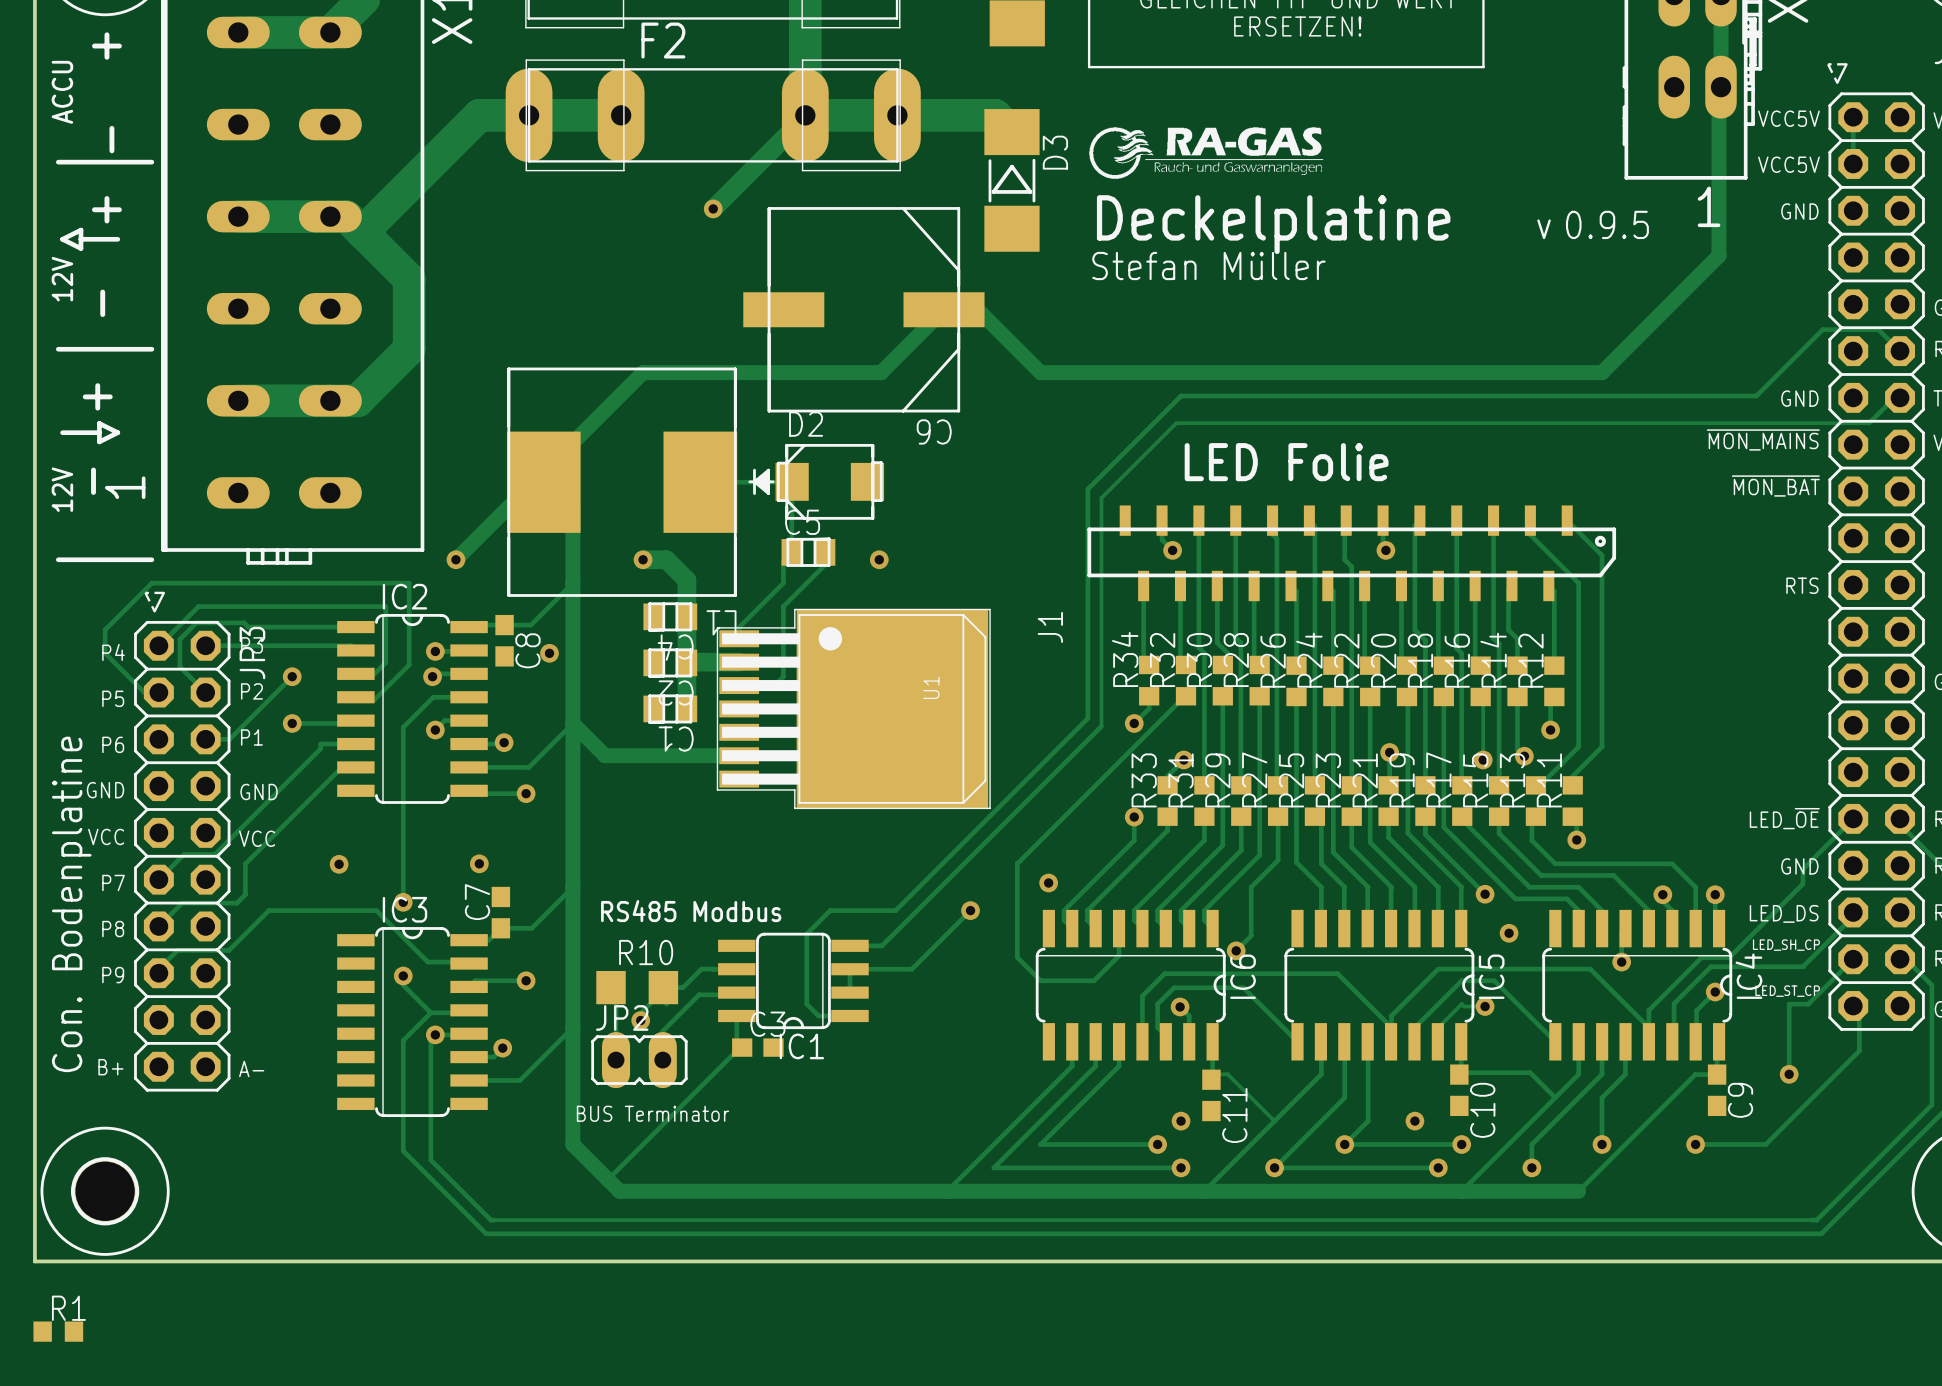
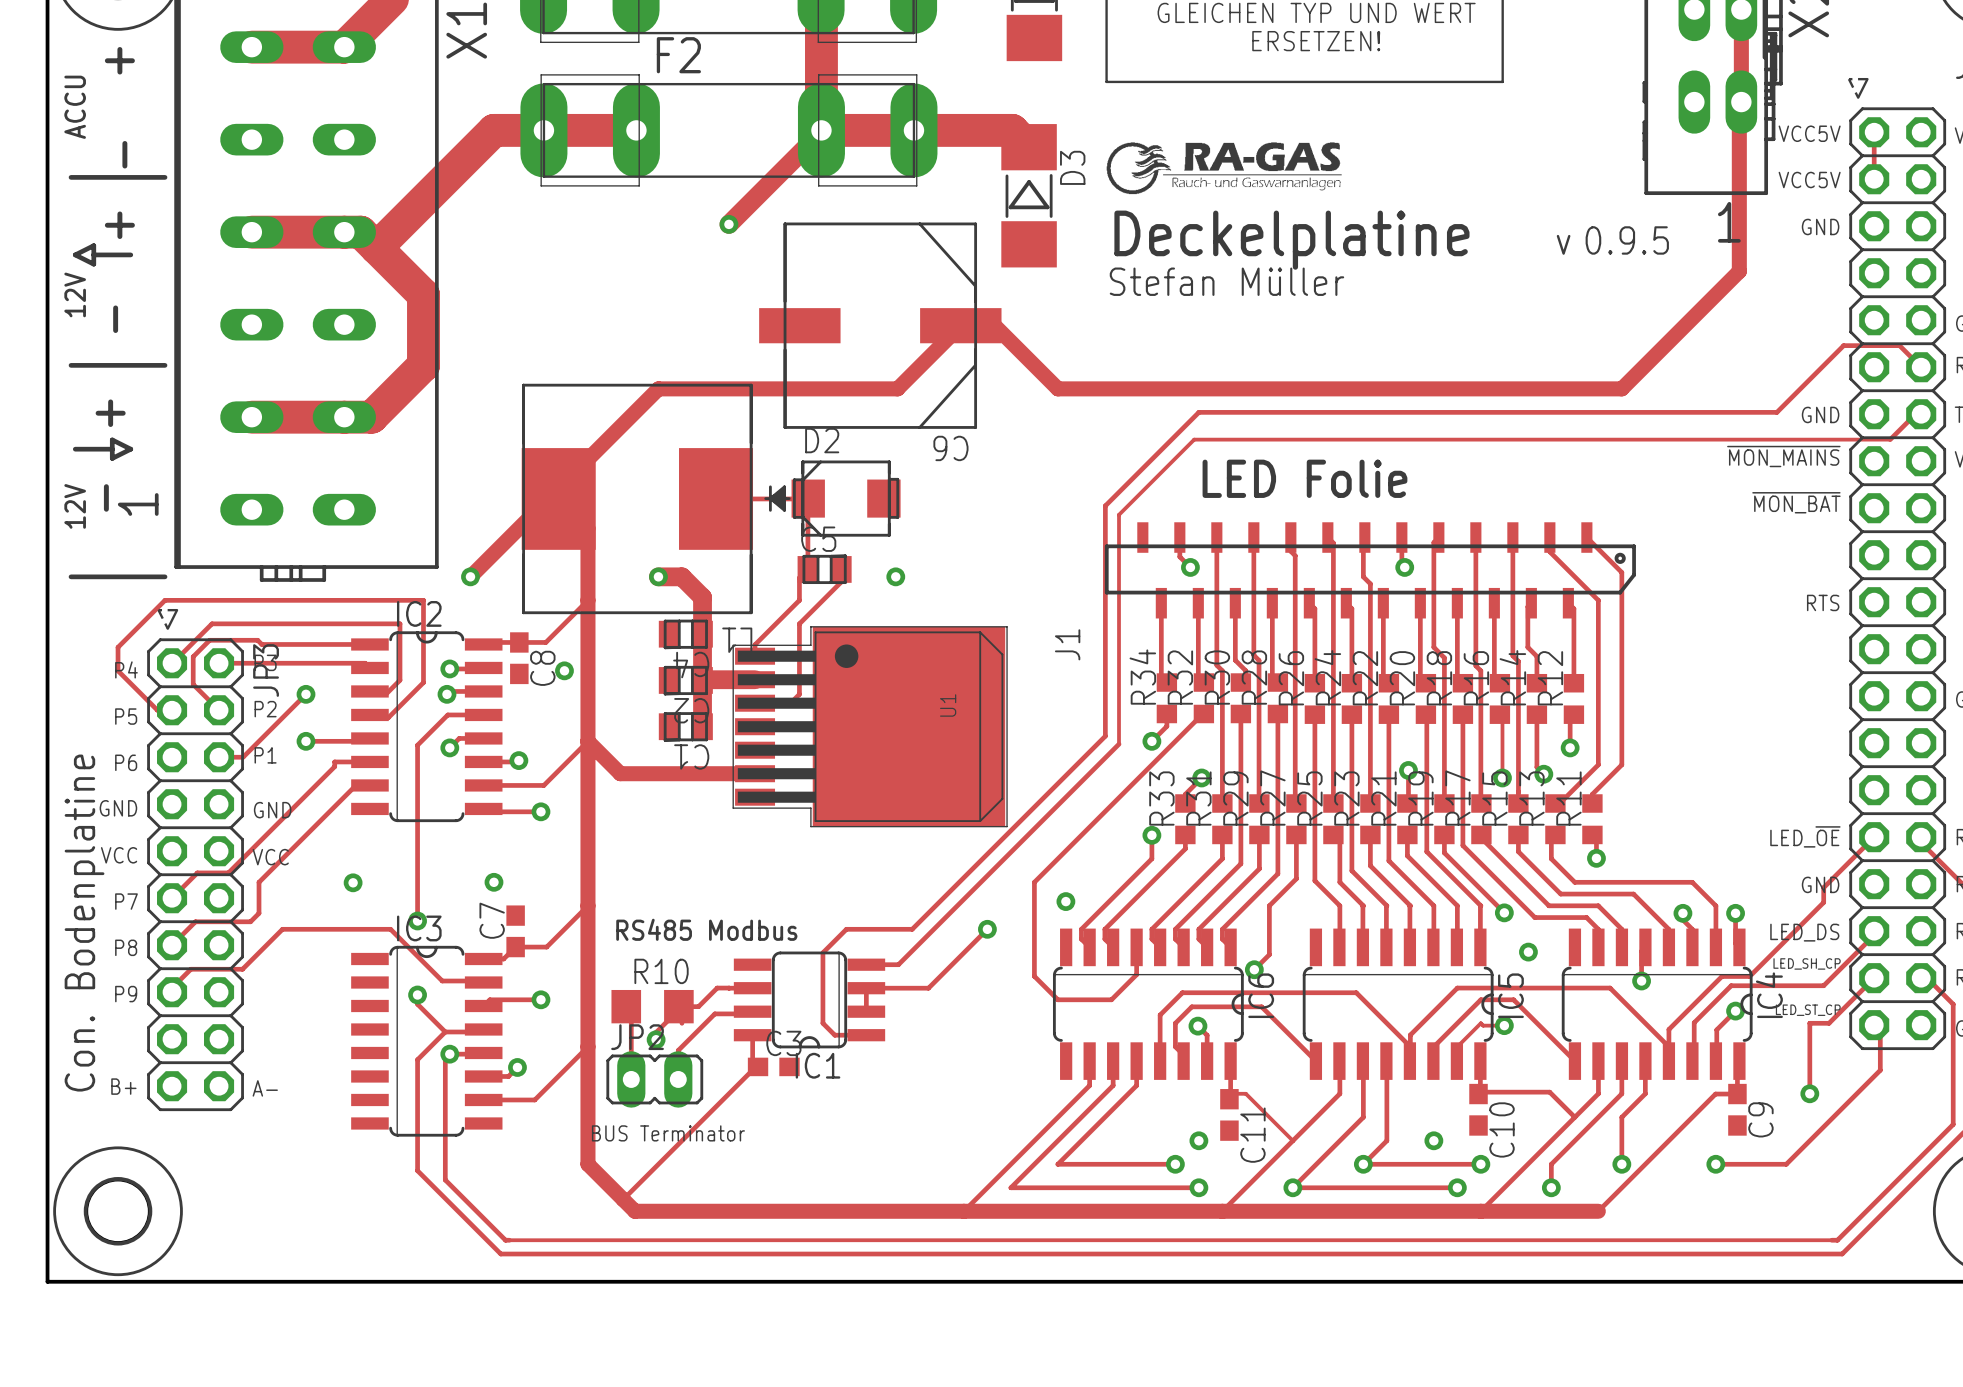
R1: (58, 1331) -> none

